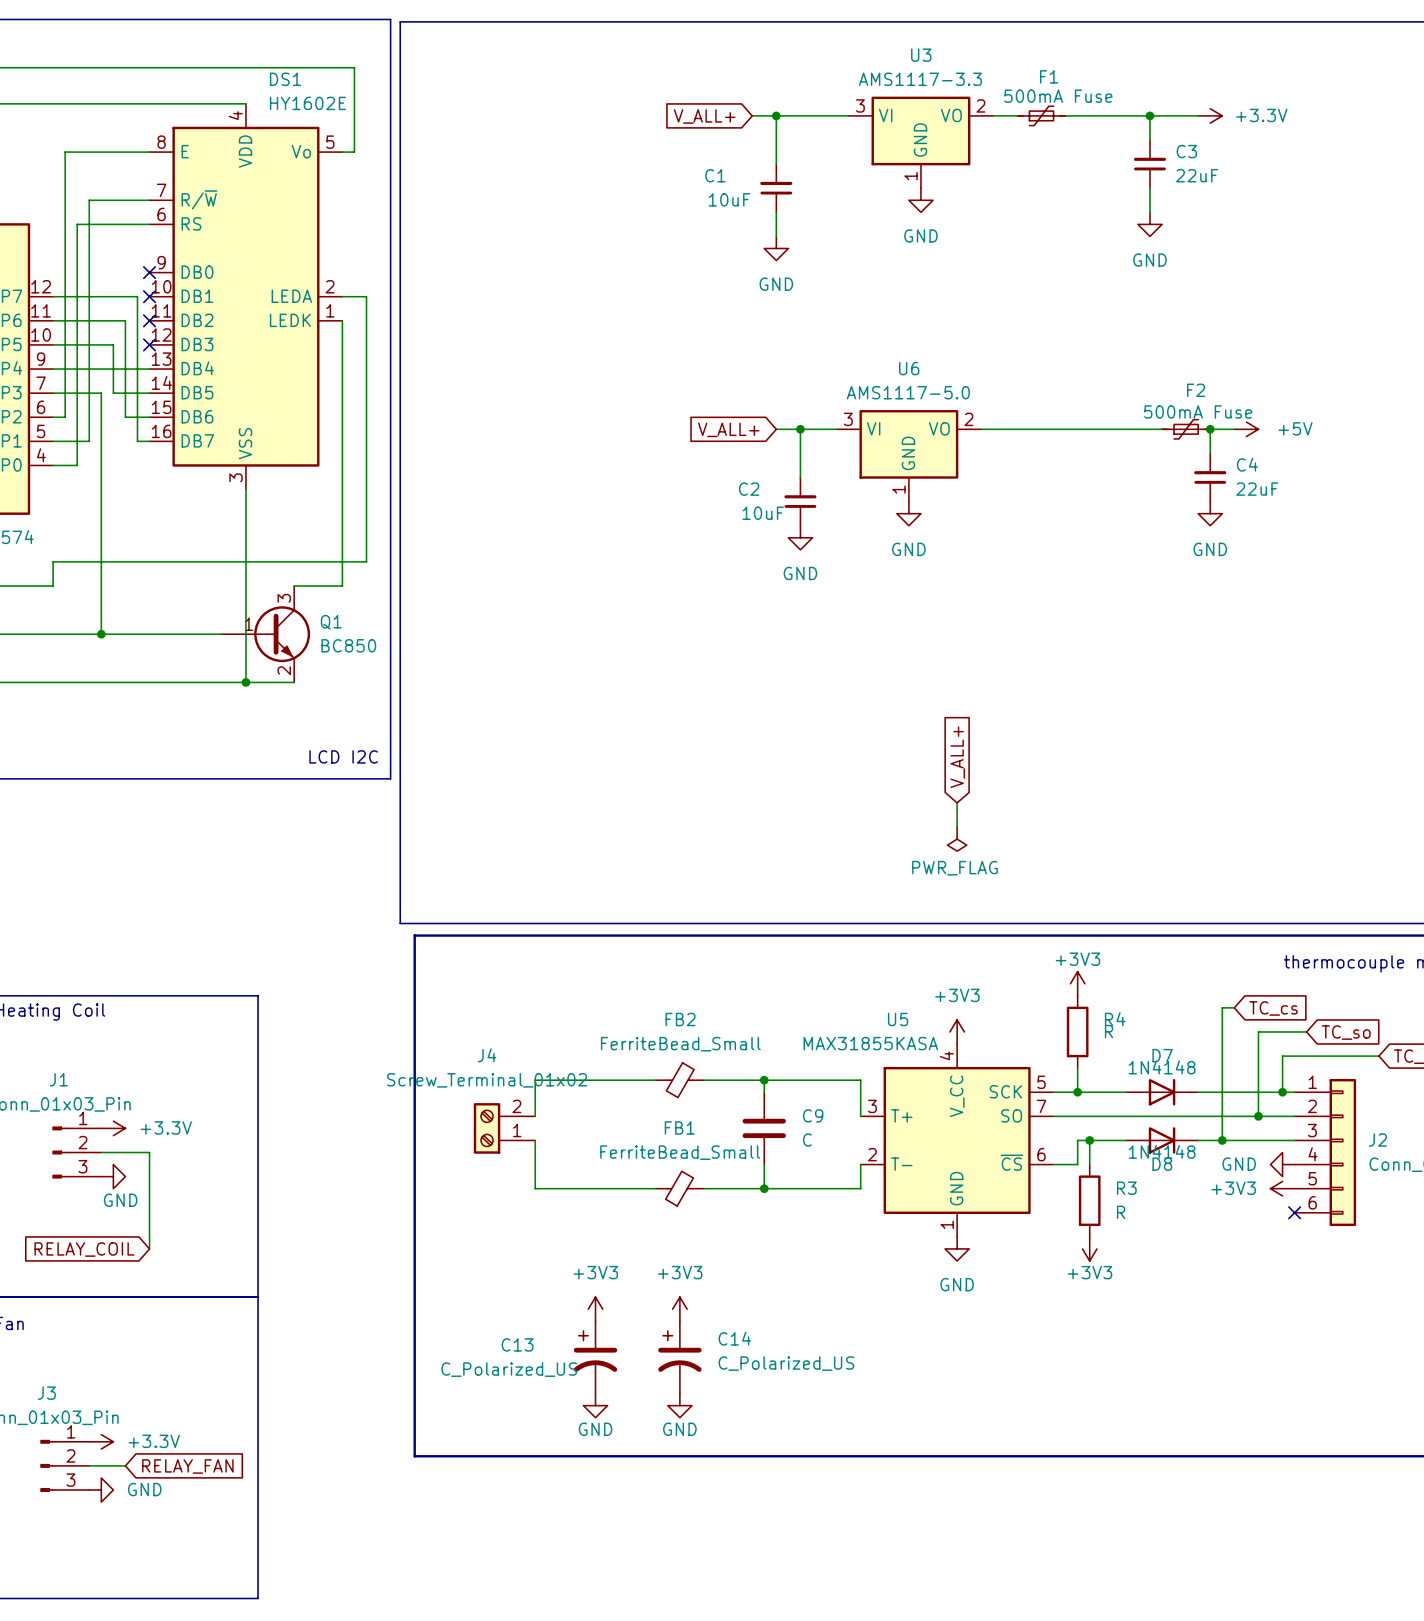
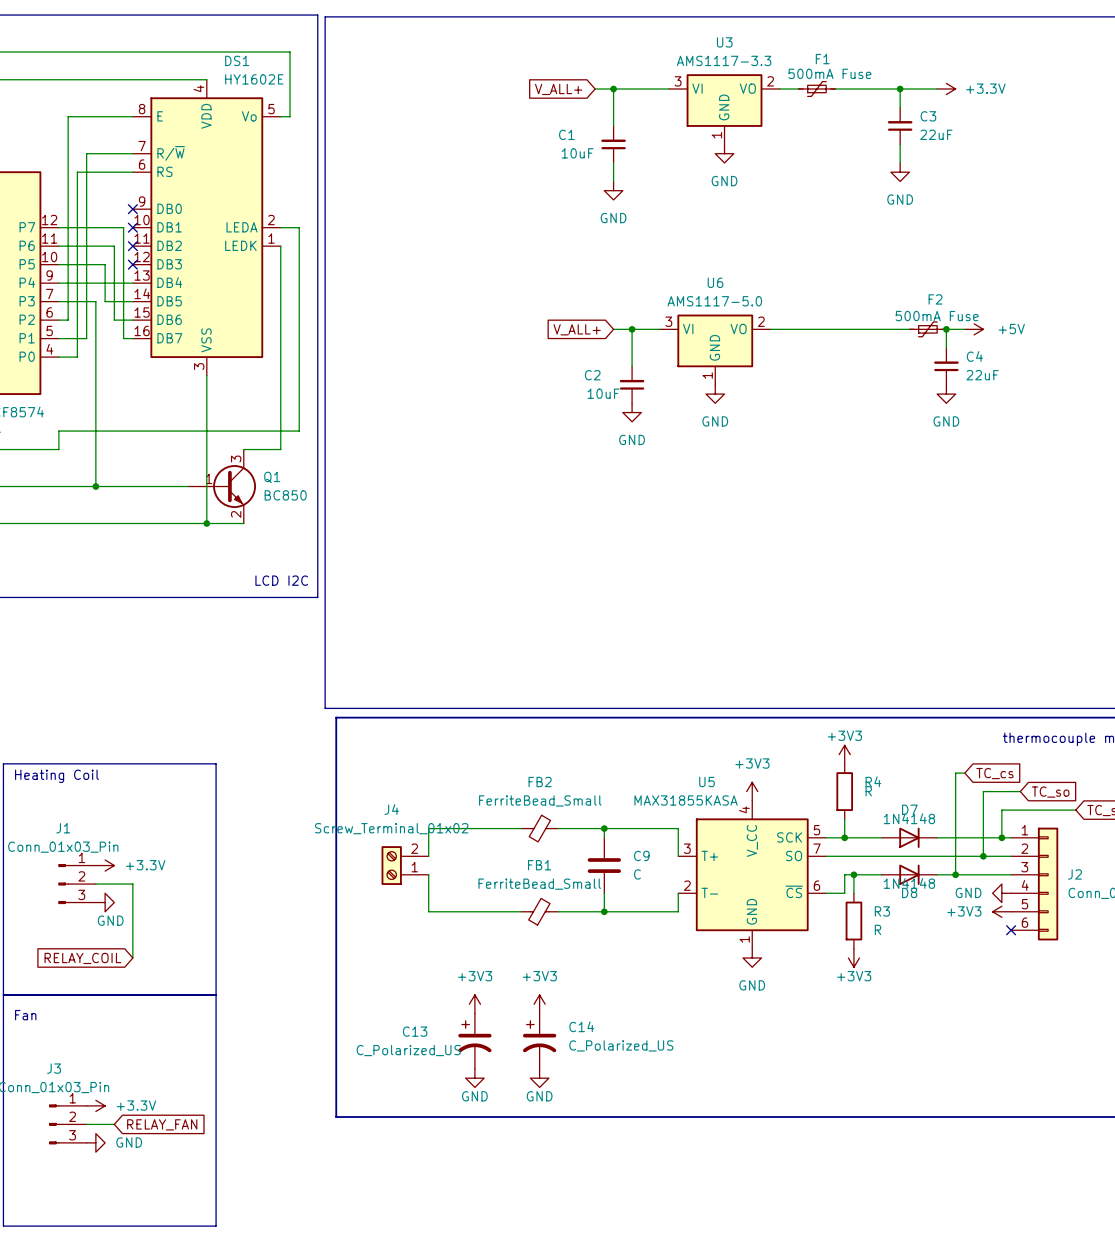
global label: V_ALL+ (957, 757) -> none
wire: (957, 802) (957, 827) -> none
power symbol: PWR_FLAG (957, 839) -> none

